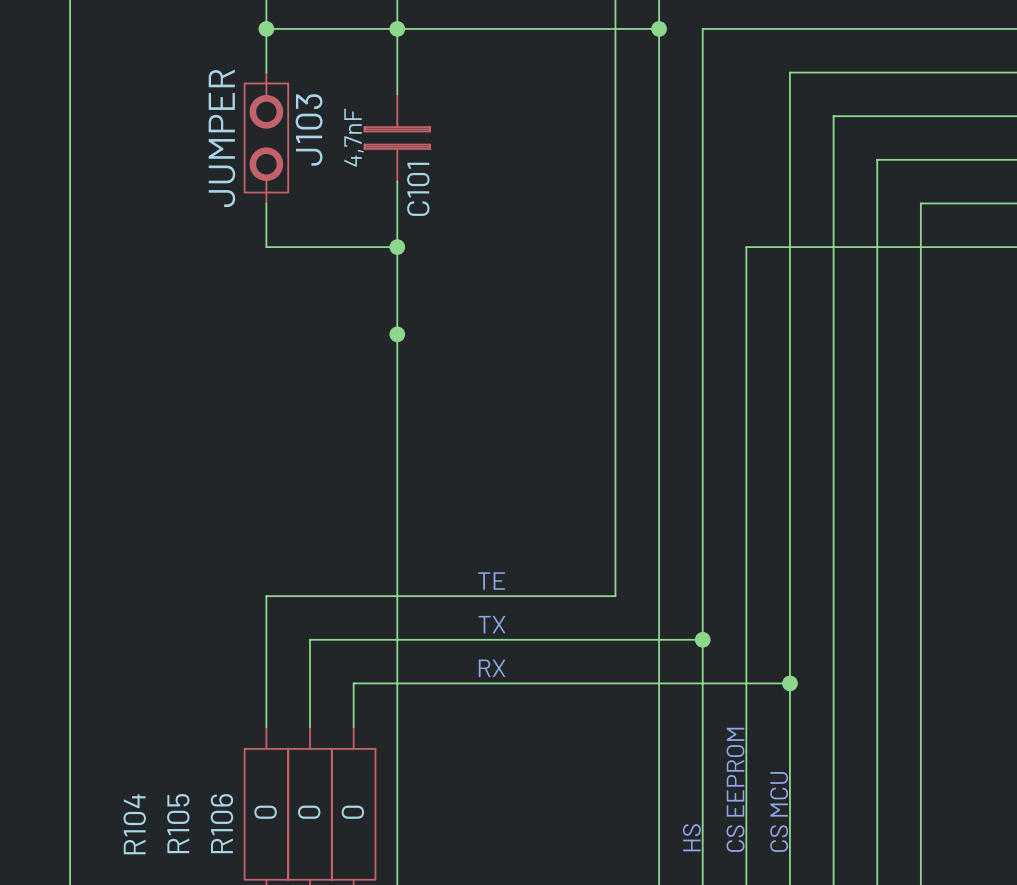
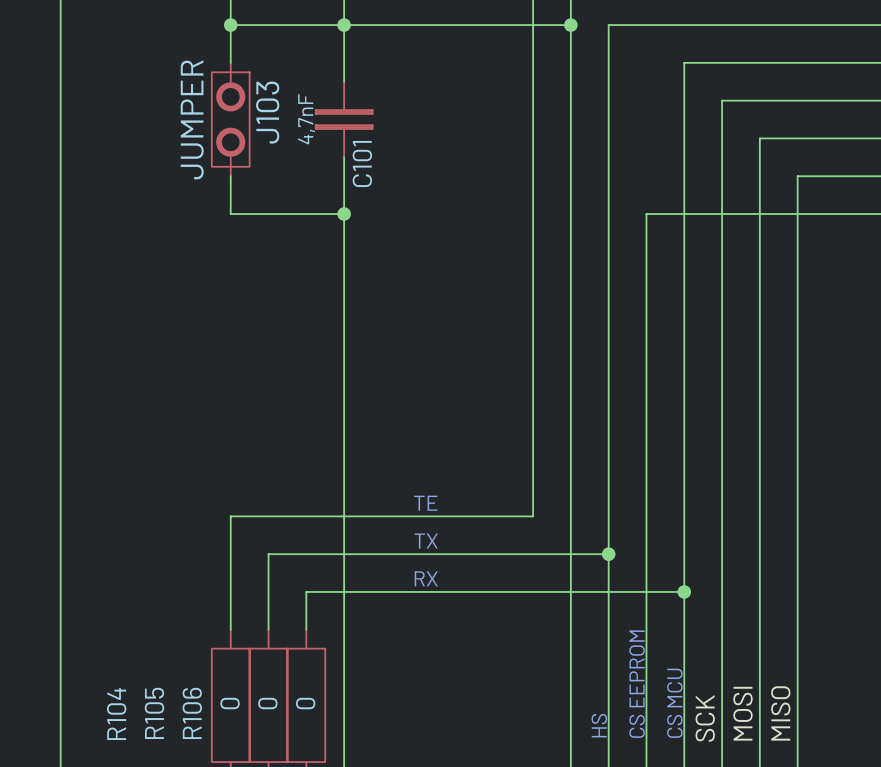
junction: (397, 334) -> none
label: none -> MOSI (742, 713)
label: none -> MISO (780, 713)
label: none -> SCK (705, 718)

